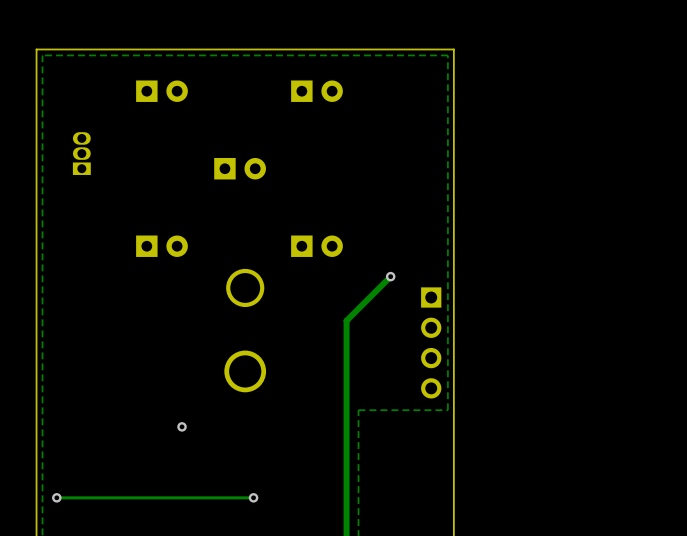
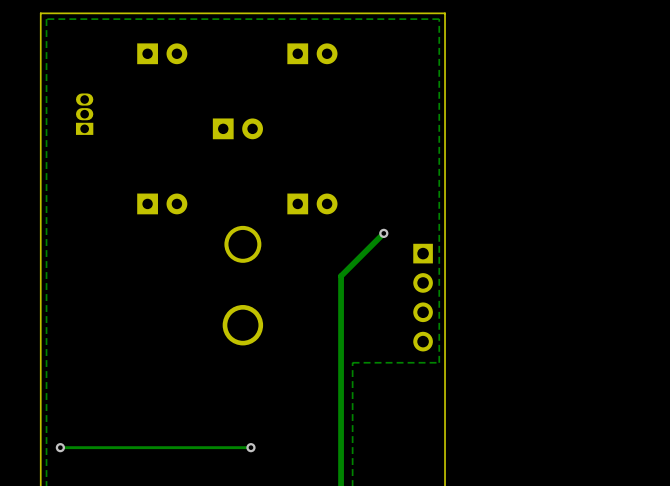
via: (182, 426) -> none

